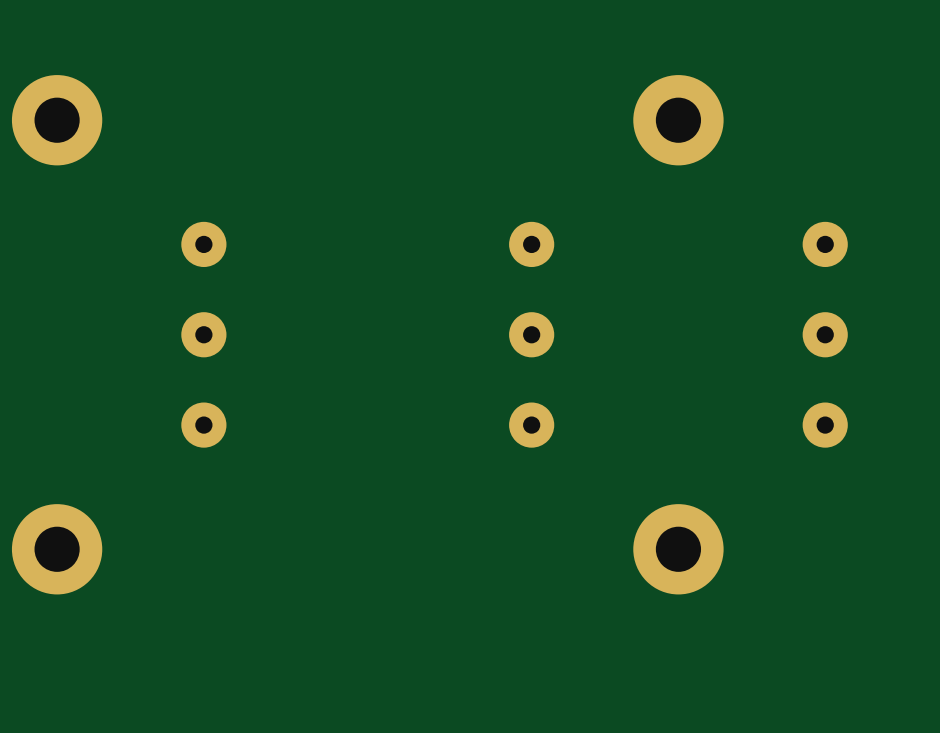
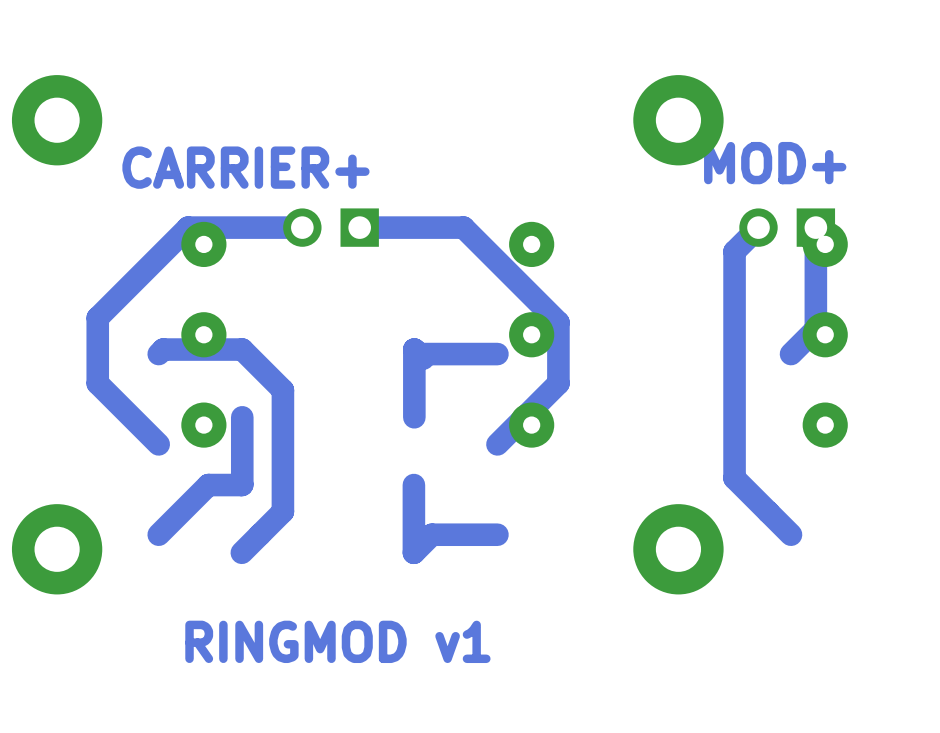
text: none -> MOD+ (775, 163)
text: none -> CARRIER+ (245, 167)
track: none -> (302, 227) (188, 227) (97, 317) (97, 383) (158, 444)
part: none -> (331, 227)
track: none -> (359, 227) (463, 227) (558, 322) (558, 383) (497, 444)
track: none -> (758, 227) (734, 251) (734, 478) (791, 534)
part: none -> (787, 227)
track: none -> (815, 227) (815, 329) (791, 354)
track: none -> (158, 354) (163, 349) (242, 349) (282, 390) (282, 511) (241, 552)
track: none -> (497, 354) (418, 354)
track: none -> (423, 358) (414, 349) (414, 417)
track: none -> (242, 417) (242, 484) (208, 485) (158, 534)
track: none -> (413, 485) (413, 552) (431, 534) (497, 534)
text: none -> RINGMOD v1 (337, 641)

